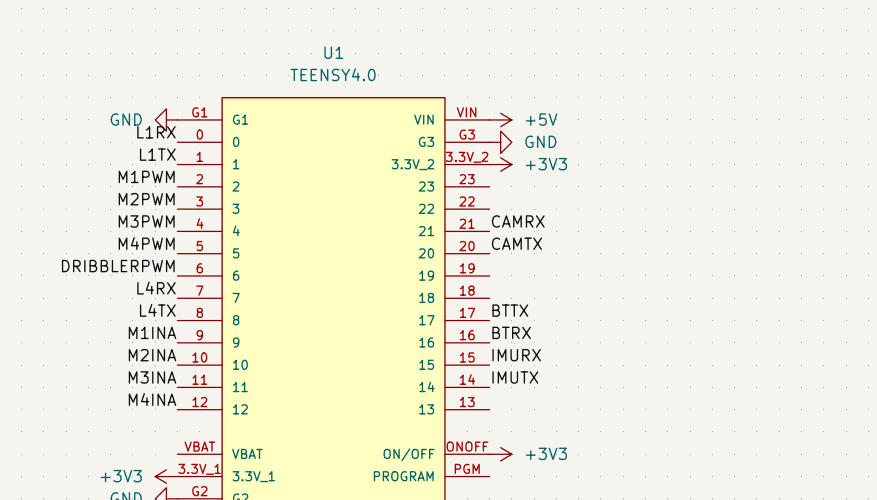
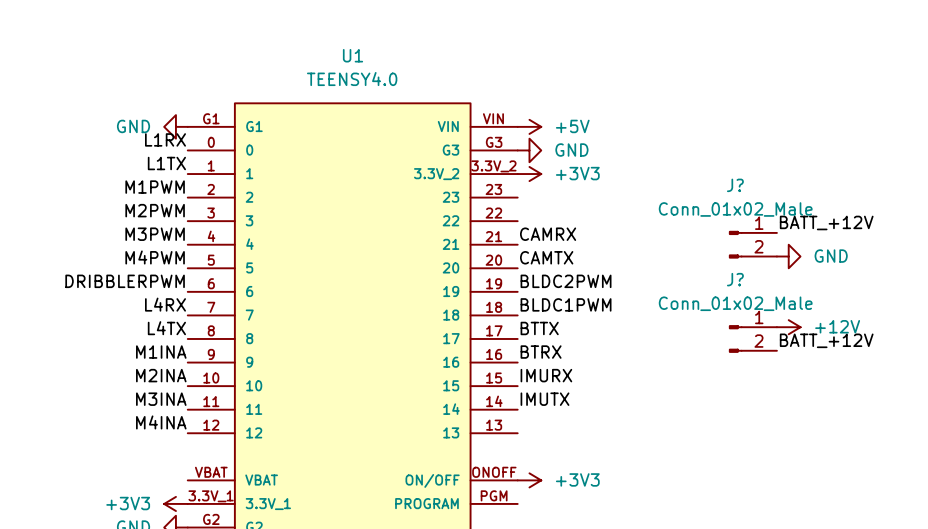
label: none -> BATT_+12V (826, 222)
J?: none -> Conn_01x02_Male (753, 244)
power symbol: none -> GND (788, 256)
label: none -> BLDC2PWM (566, 281)
label: none -> BLDC1PWM (566, 304)
power symbol: none -> +12V (788, 327)
J?: none -> Conn_01x02_Male (753, 338)
label: none -> BATT_+12V (826, 340)

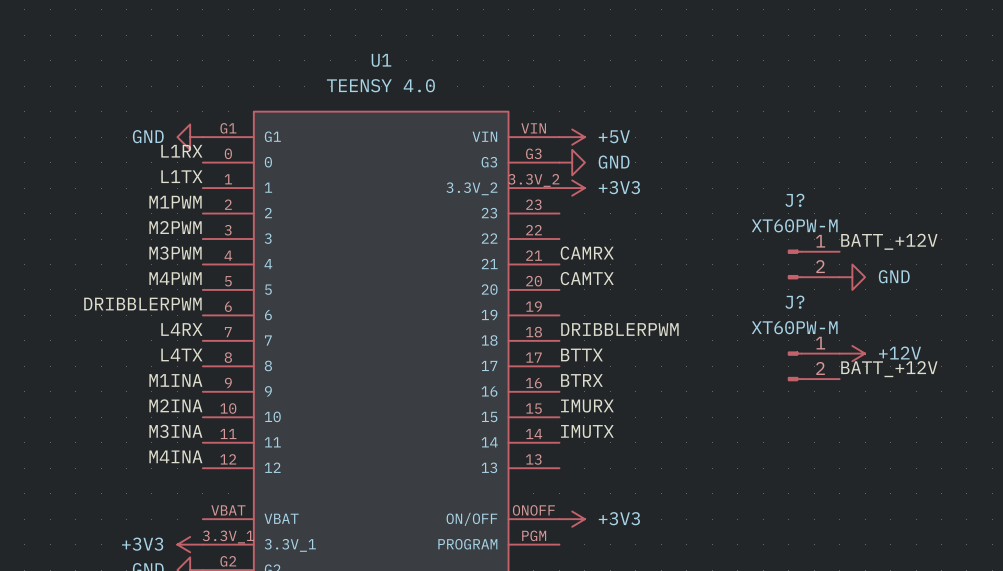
U1 value: TEENSY4.0 (352, 79) -> TEENSY 4.0 (380, 85)
J? value: Conn_01x02_Male (735, 209) -> XT60PW-M (794, 225)
label: BLDC2PWM (566, 281) -> none
J? value: Conn_01x02_Male (735, 303) -> XT60PW-M (794, 327)
label: BLDC1PWM (566, 304) -> DRIBBLERPWM (619, 329)

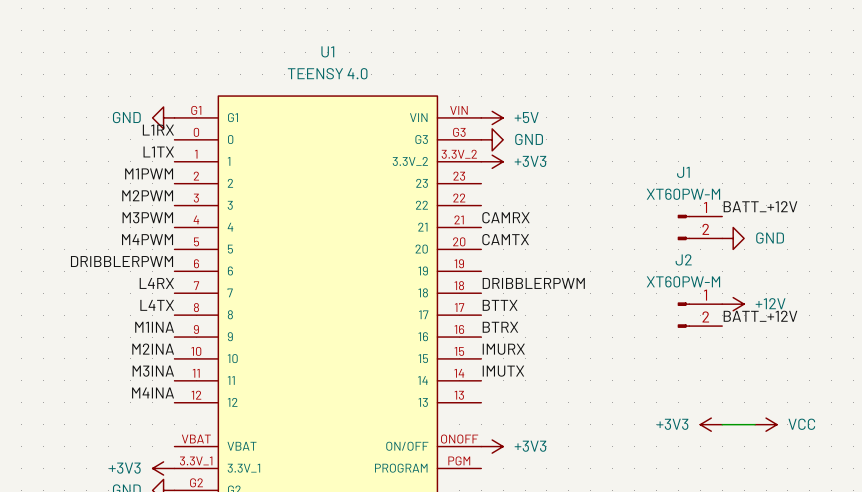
J? name: J? (794, 200) -> J1 (683, 172)
J? name: J? (794, 302) -> J2 (683, 259)
power symbol: none -> +3V3 (711, 424)
wire: none -> (722, 424) (755, 424)
power symbol: none -> VCC (766, 424)

